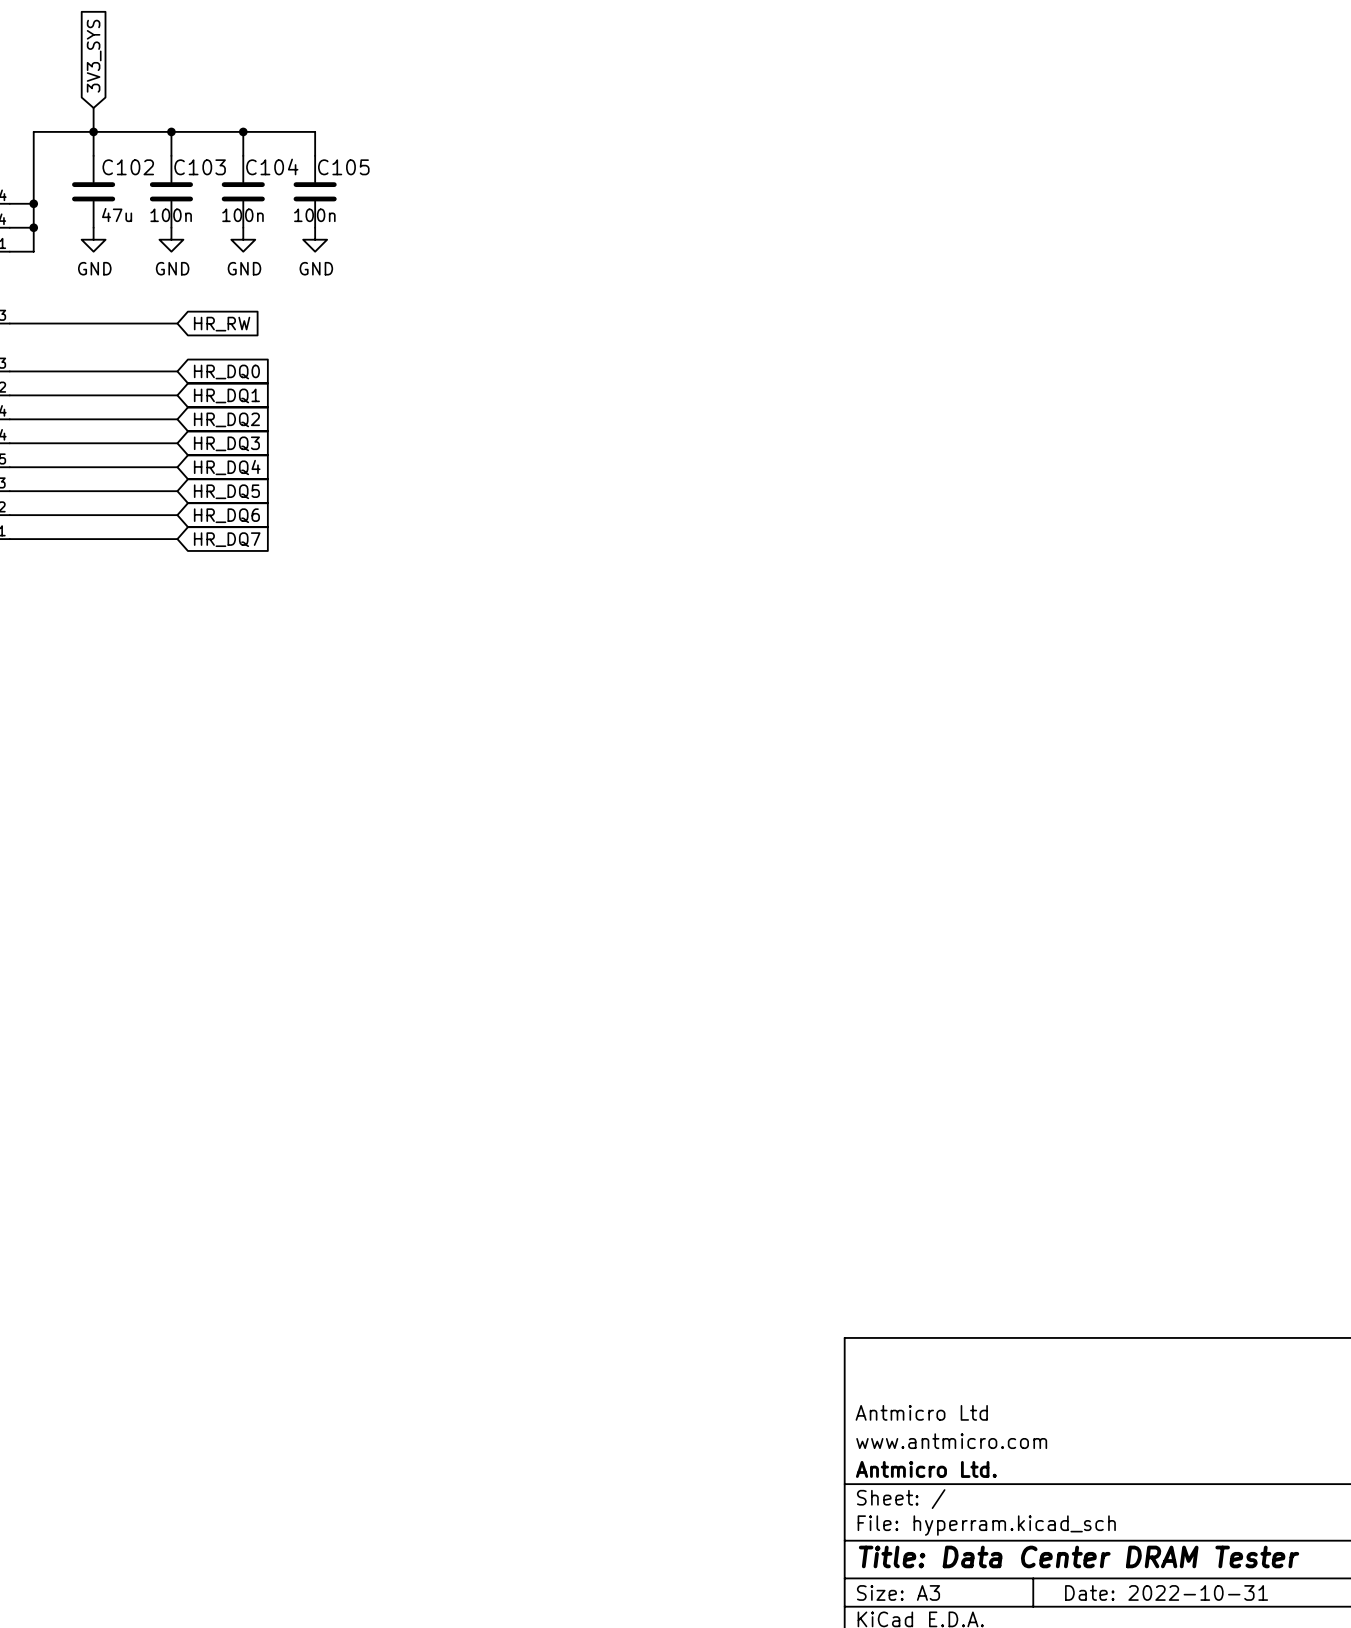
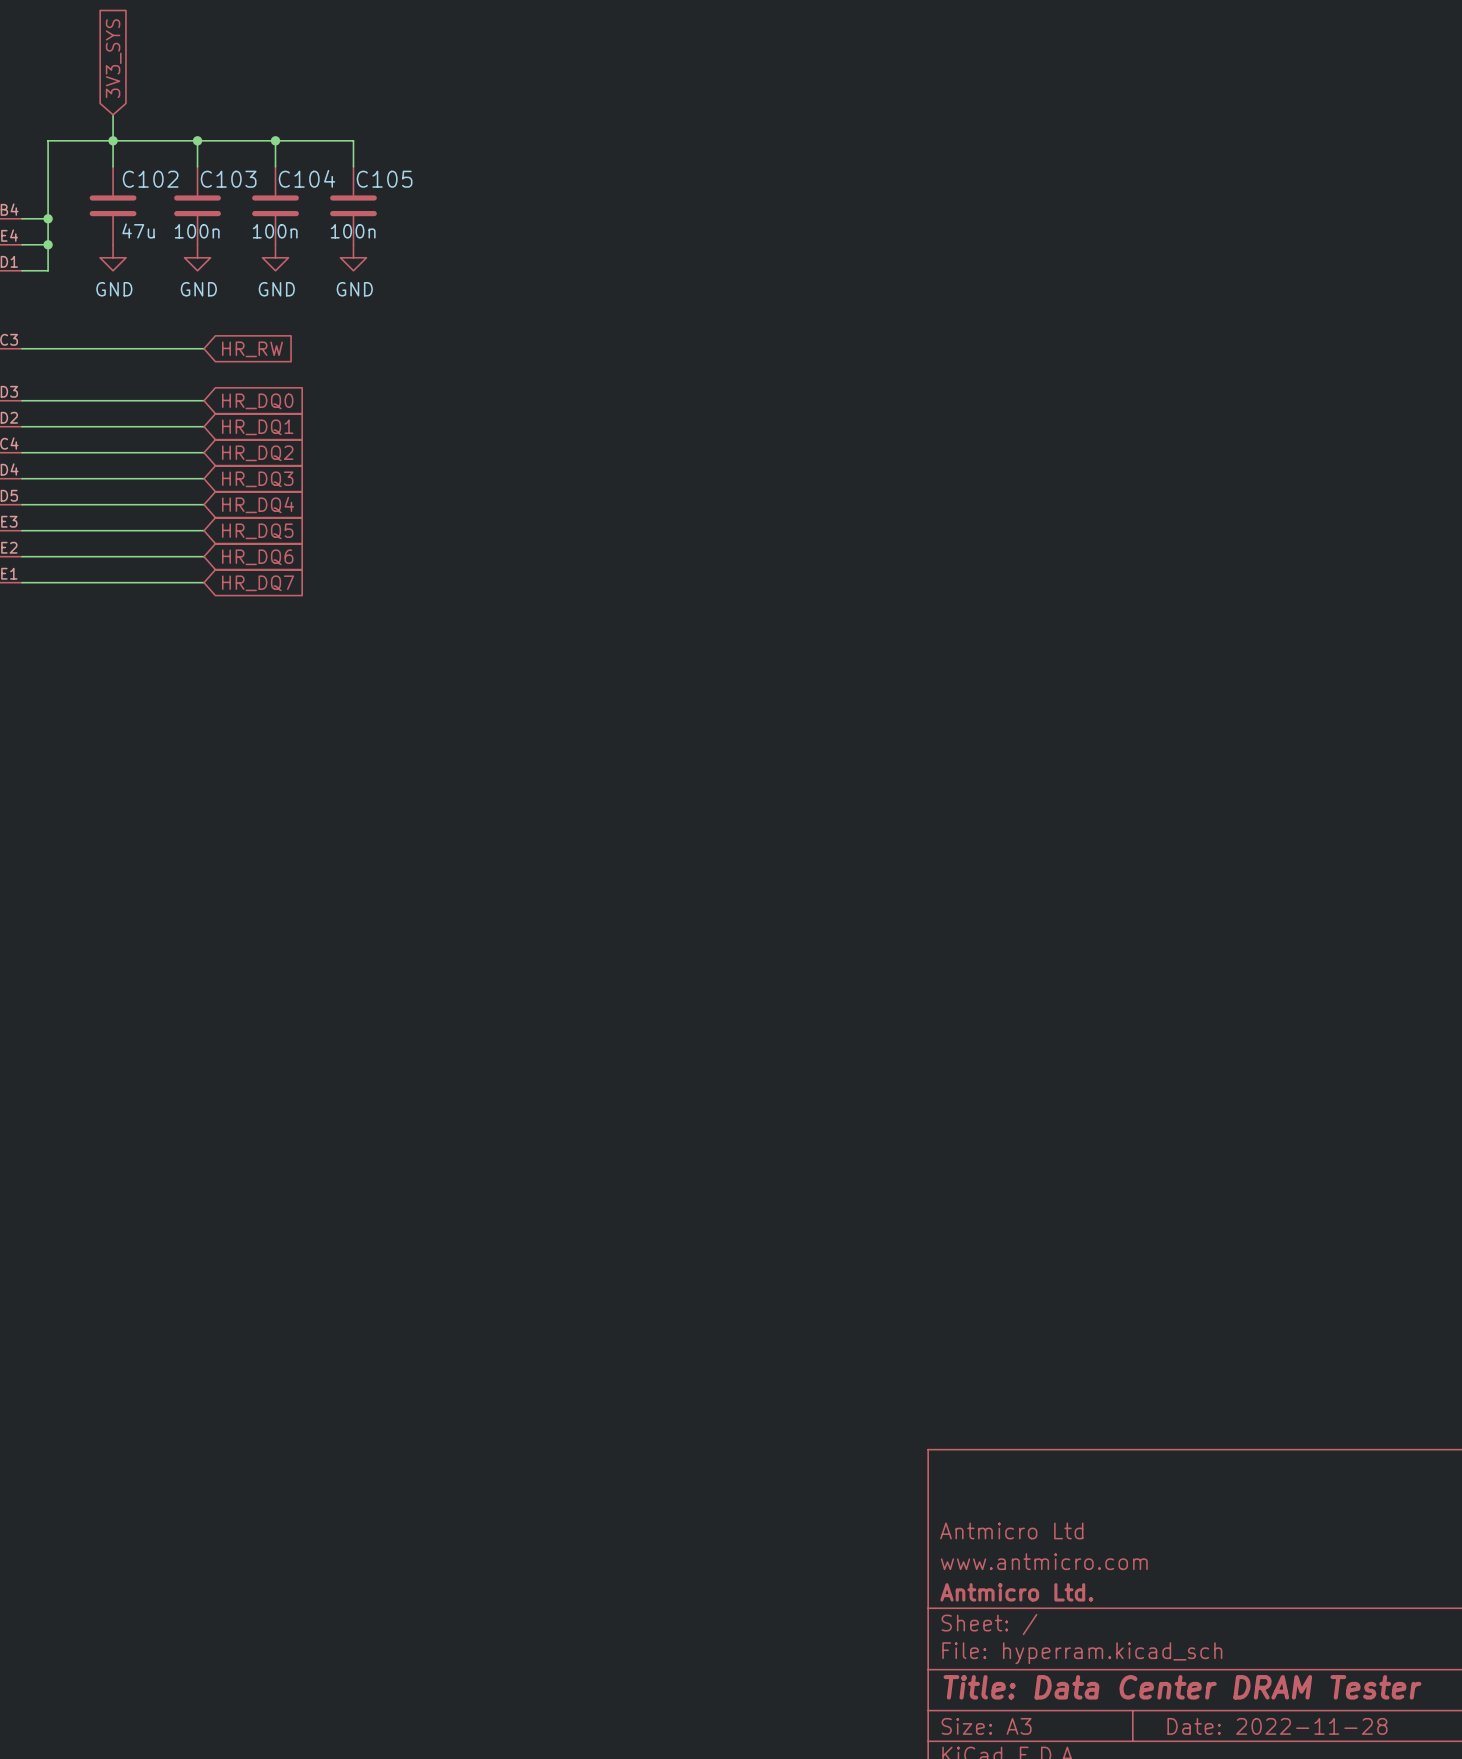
title block: Date: 2022-10-31 (1166, 1592) -> Date: 2022-11-28 (1277, 1726)

